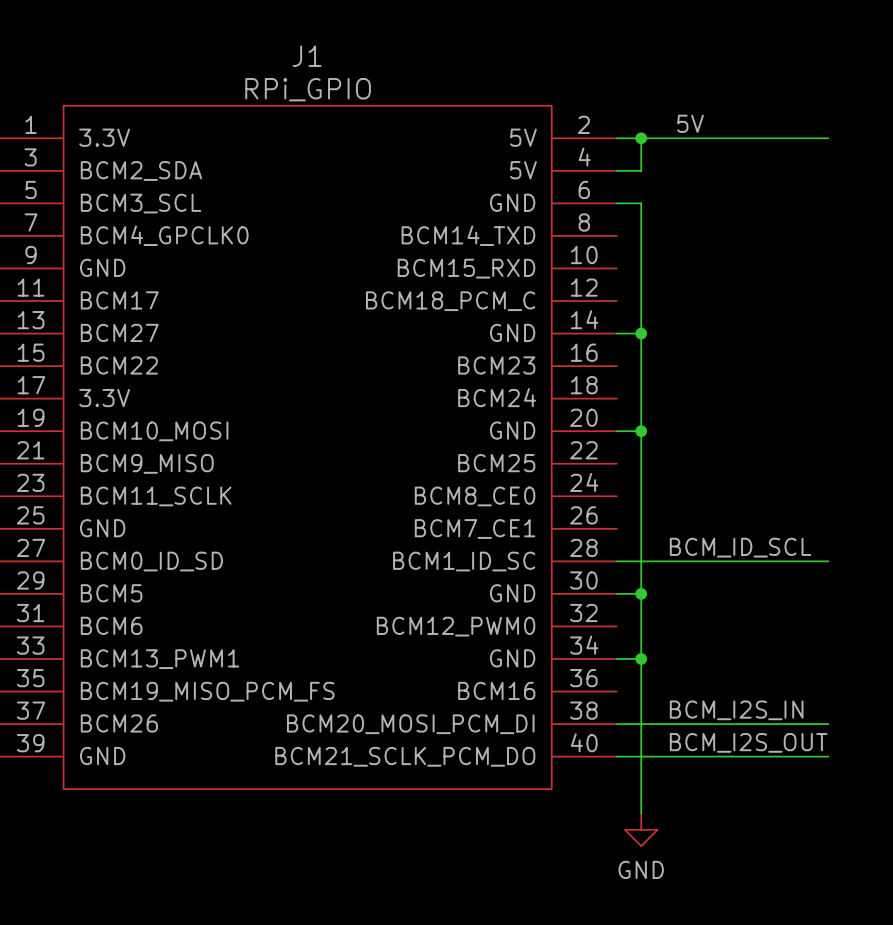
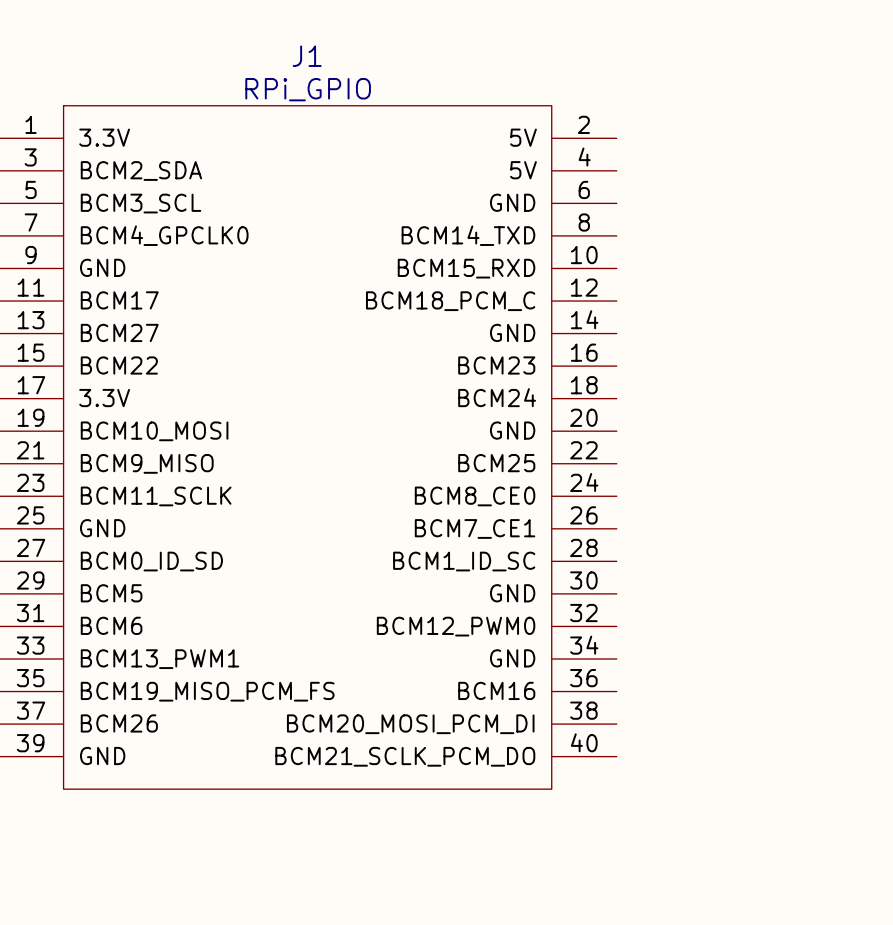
label: 5V (690, 123) -> none
wire: (616, 138) (828, 138) -> none
wire: (641, 138) (641, 170) (616, 170) -> none
junction: (641, 138) -> none
wire: (616, 203) (641, 203) (641, 813) -> none
wire: (616, 333) (641, 333) -> none
junction: (641, 333) -> none
wire: (616, 431) (641, 431) -> none
junction: (641, 431) -> none
label: BCM_ID_SCL (740, 547) -> none
wire: (616, 561) (828, 561) -> none
wire: (616, 593) (641, 593) -> none
junction: (641, 593) -> none
wire: (616, 658) (641, 658) -> none
junction: (641, 658) -> none
label: BCM_I2S_IN (736, 710) -> none
wire: (616, 724) (828, 724) -> none
label: BCM_I2S_OUT (748, 742) -> none
wire: (616, 756) (828, 756) -> none
power symbol: GND (641, 829) -> none

